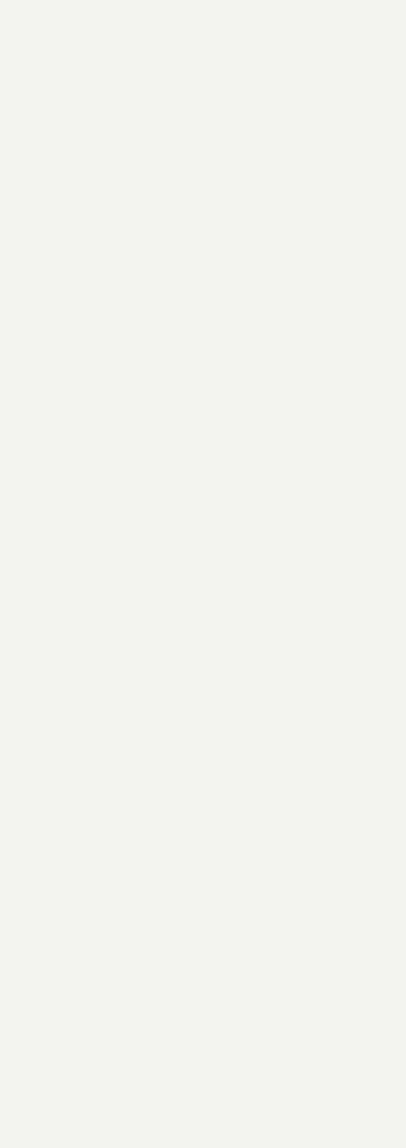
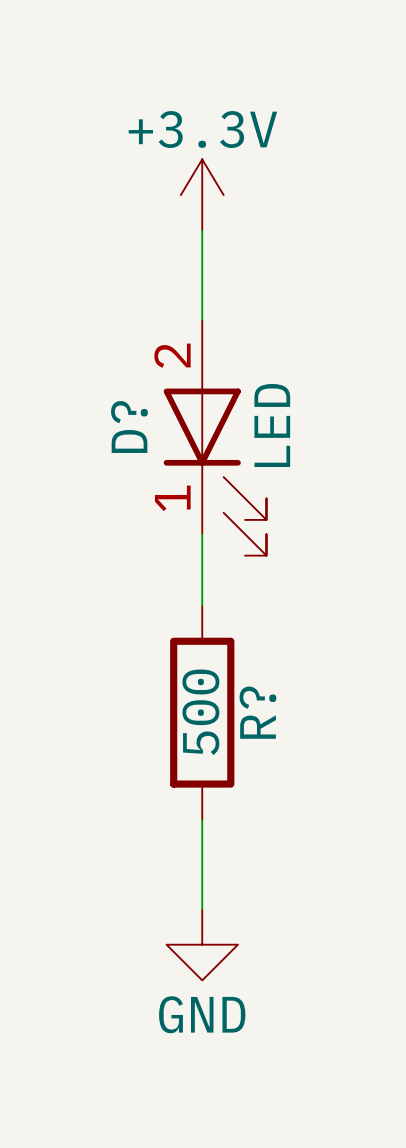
power symbol: none -> +3.3V (202, 195)
wire: none -> (202, 230) (202, 320)
D?: none -> LED (215, 437)
wire: none -> (202, 534) (202, 605)
R?: none -> 500 (202, 712)
wire: none -> (202, 819) (202, 909)
power symbol: none -> GND (202, 944)

